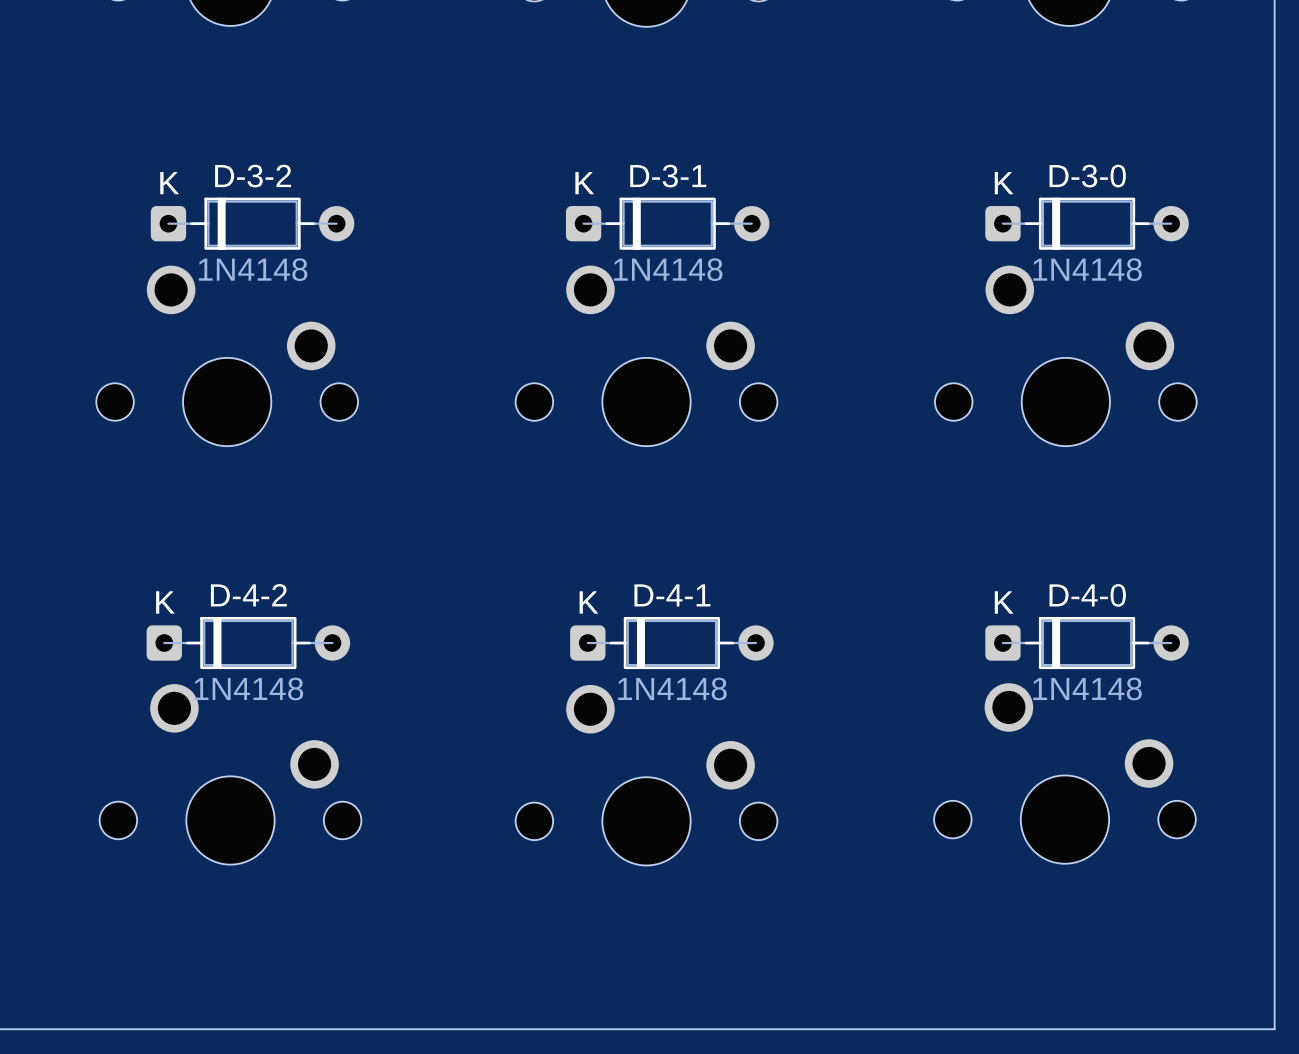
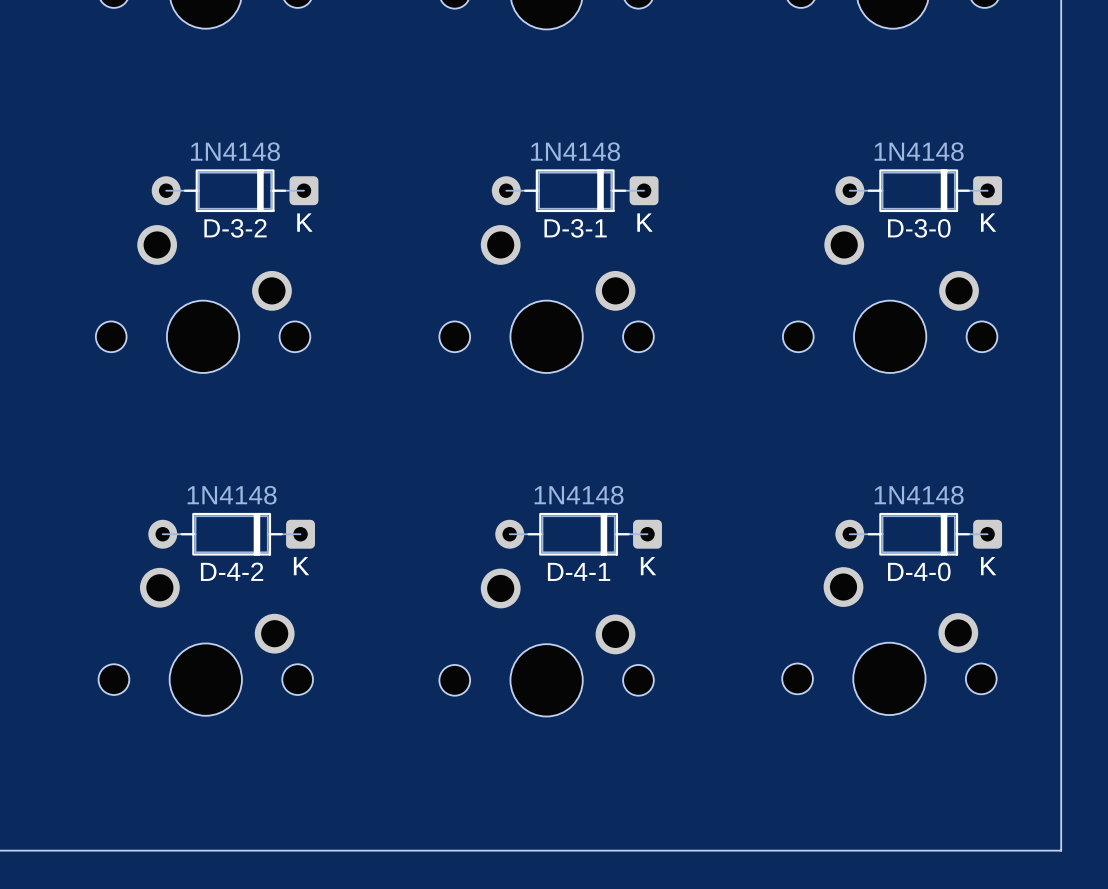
D-3-2 rotation: 0° (252, 223) -> 180° (235, 190)
D-3-1 rotation: 0° (667, 223) -> 180° (575, 190)
D-3-0 rotation: 0° (1087, 223) -> 180° (918, 190)
D-4-2 rotation: 0° (248, 643) -> 180° (231, 534)
D-4-1 rotation: 0° (671, 643) -> 180° (578, 534)
D-4-0 rotation: 0° (1087, 643) -> 180° (918, 534)

